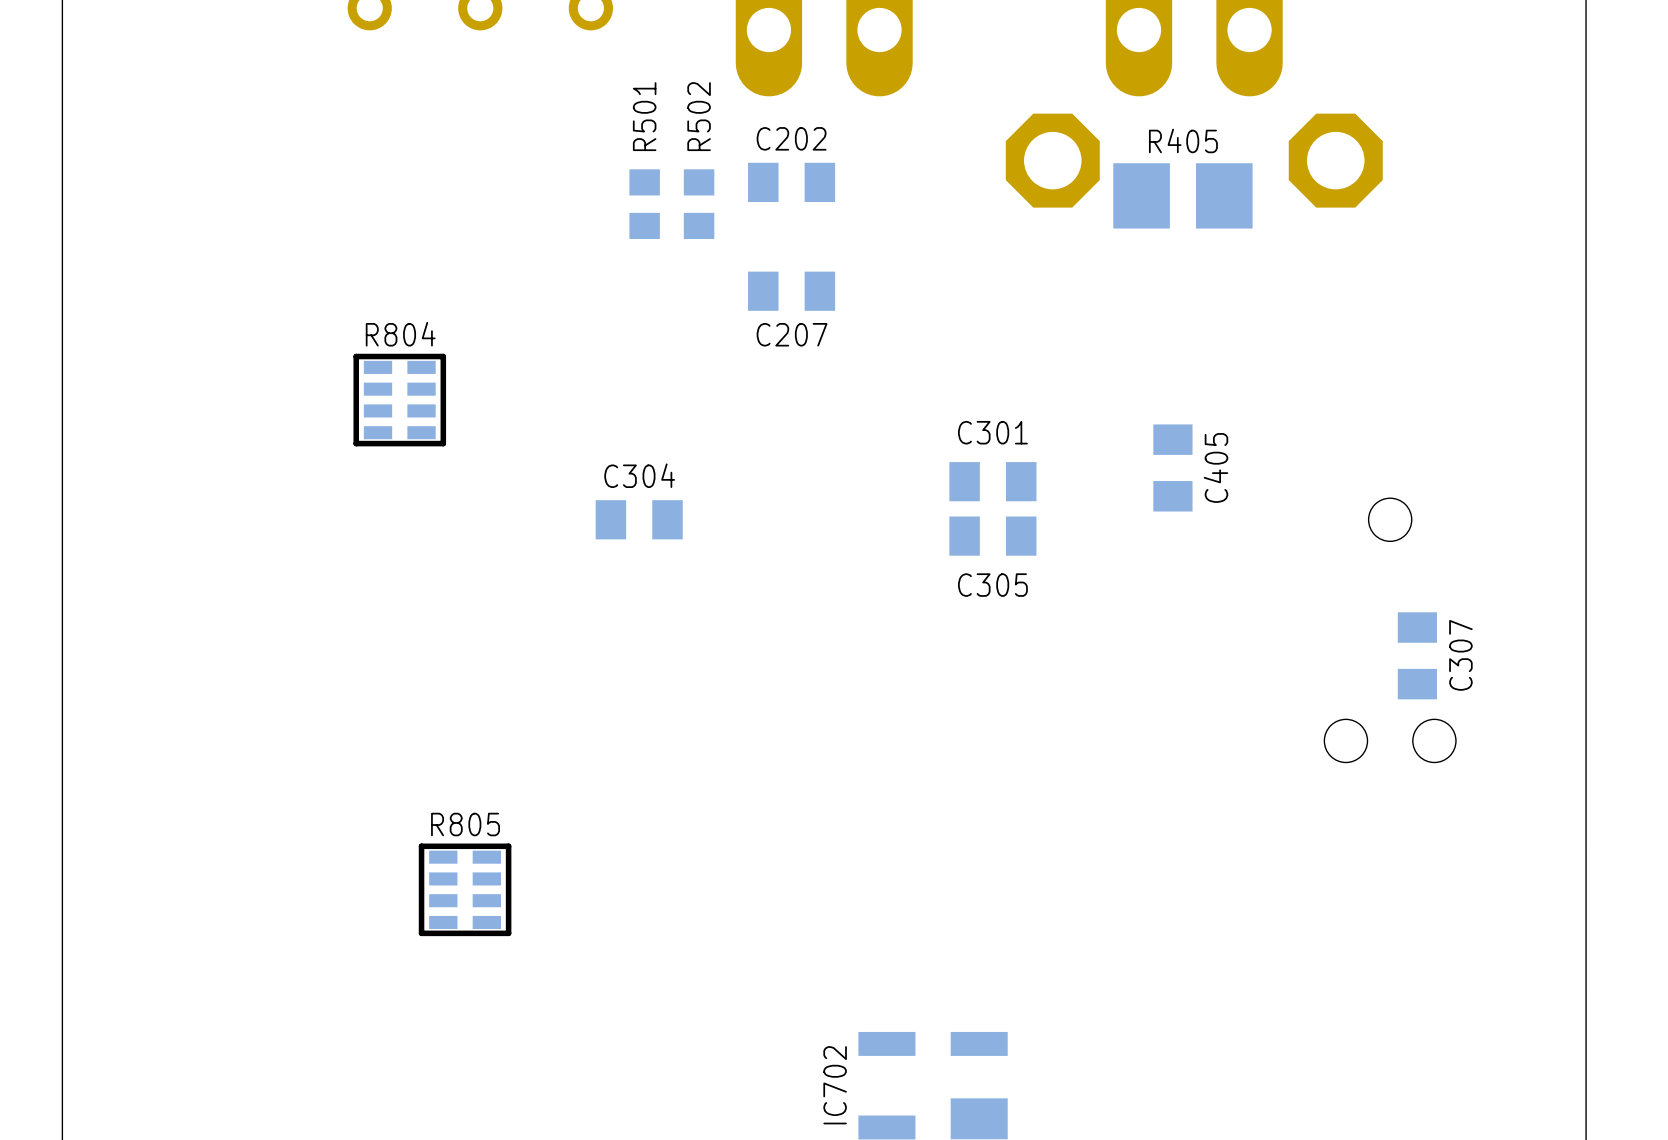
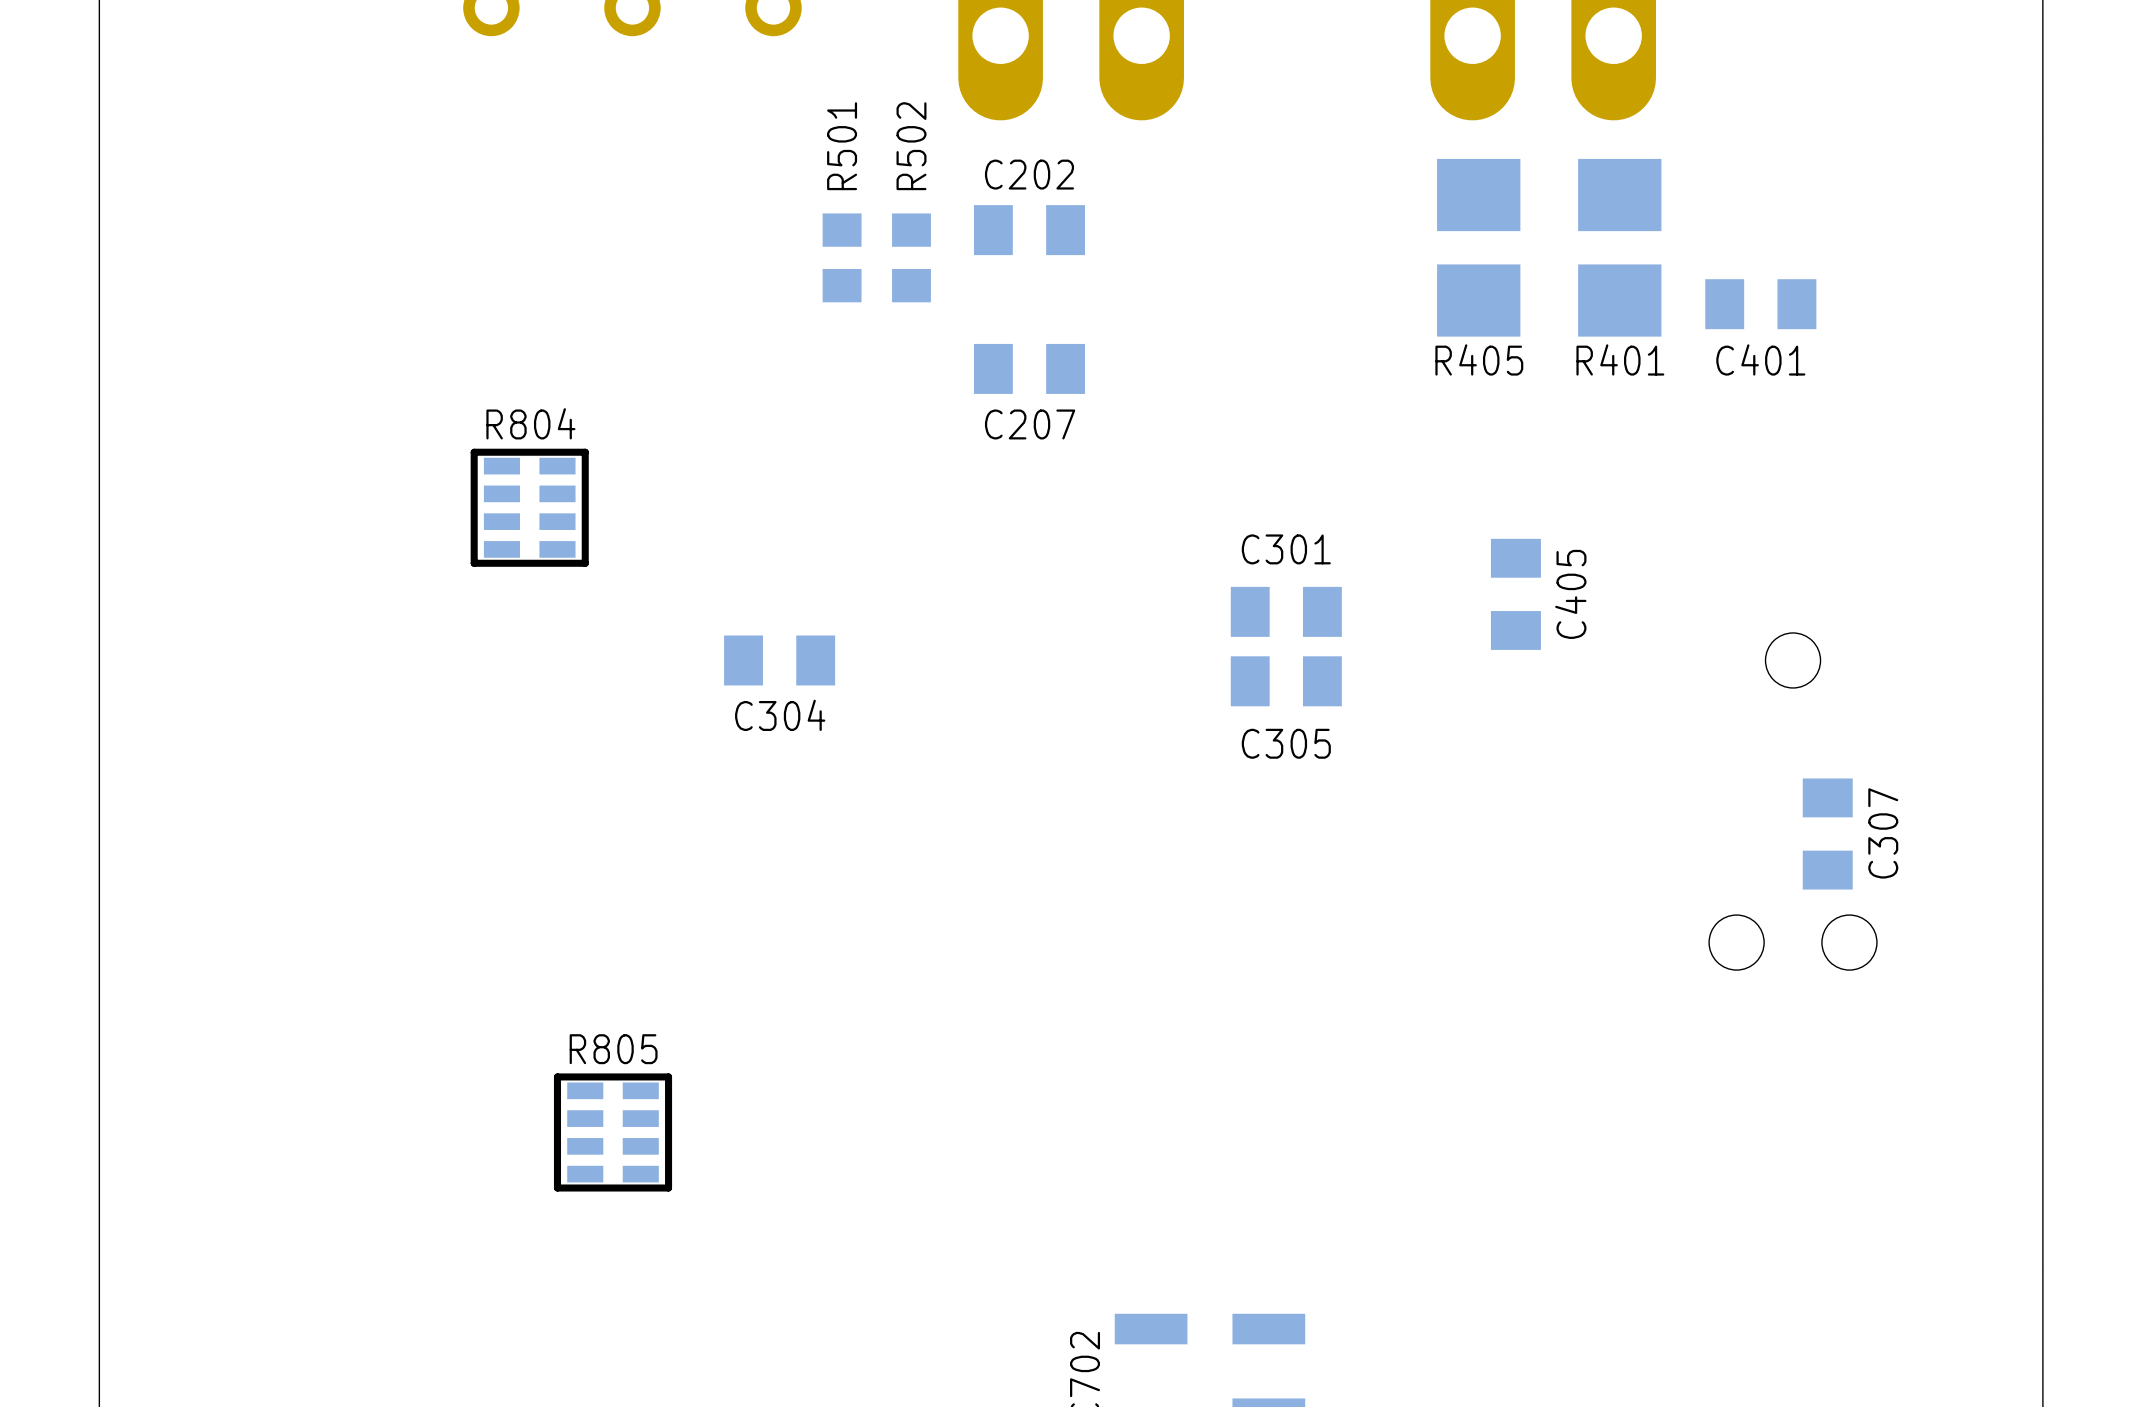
R405 name position: R405 (1183, 140) -> R405 (1479, 359)
part: (1052, 160) -> none
part: (1335, 160) -> none
R405 rotation: 0° (1182, 195) -> 90° clockwise (1478, 247)
R401: none -> (1619, 247)
C401: none -> (1760, 304)
C304 name position: C304 (639, 475) -> C304 (780, 715)
C304 position: (639, 519) -> (779, 660)

